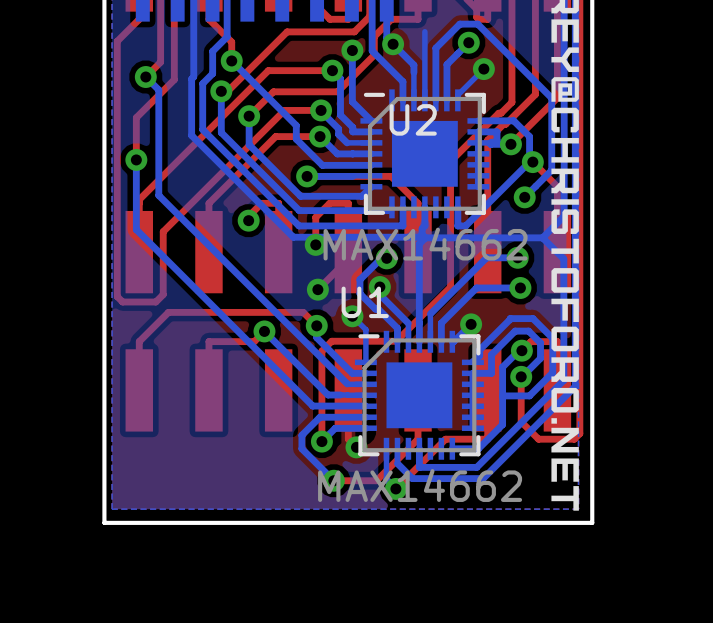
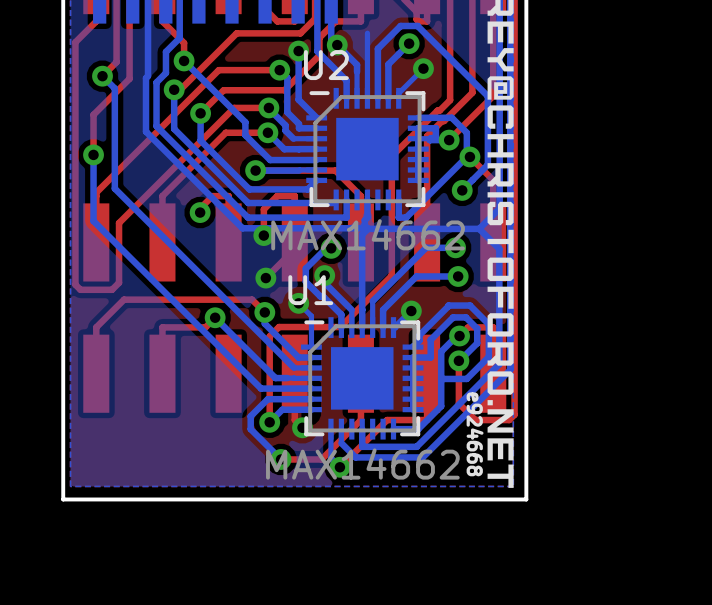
U2 name position: U2 (413, 119) -> U2 (326, 65)
text: none -> e924668 (475, 434)

